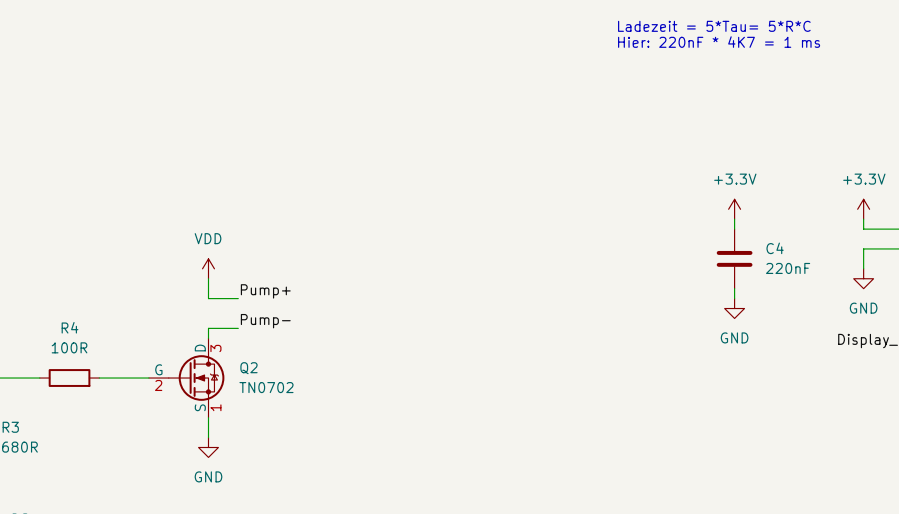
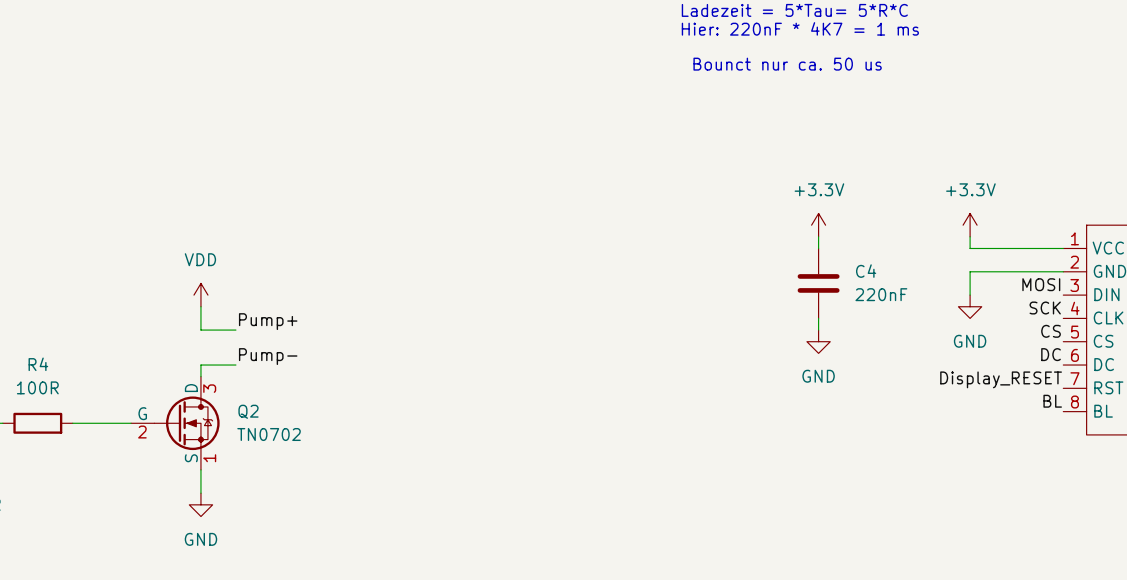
text: none -> Bounct nur ca. 50 us (787, 64)

